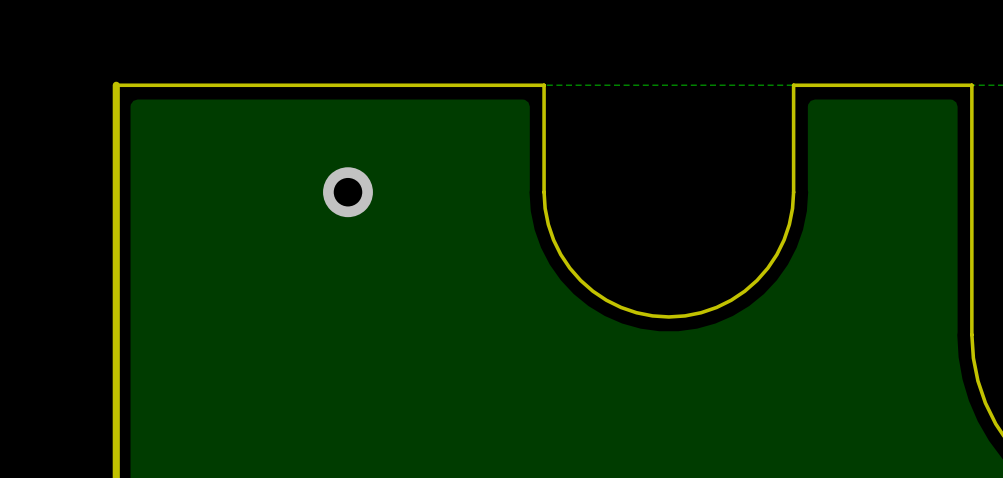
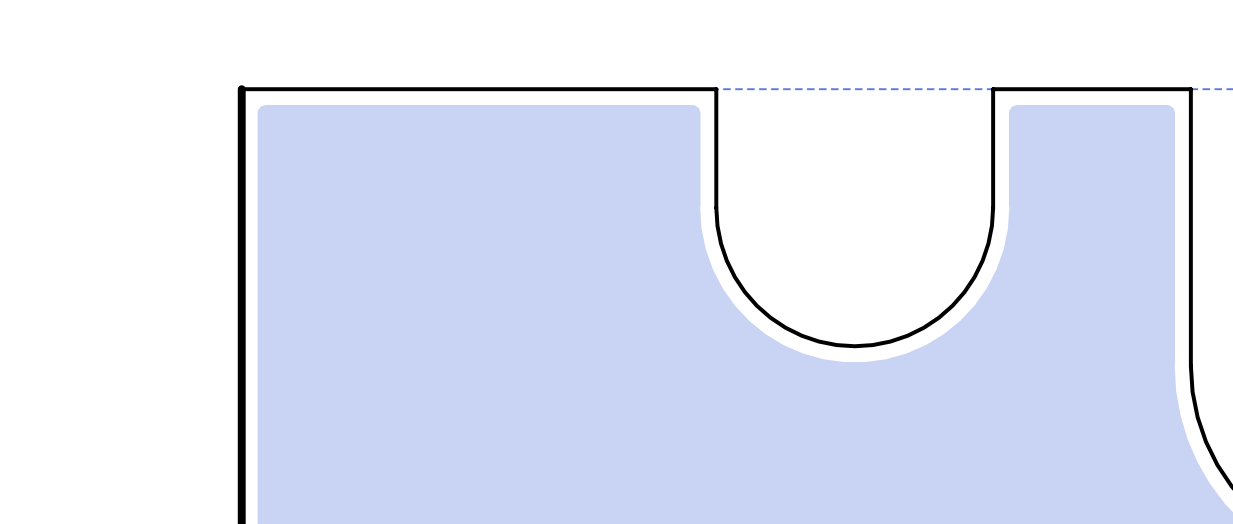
via: (347, 192) -> none

